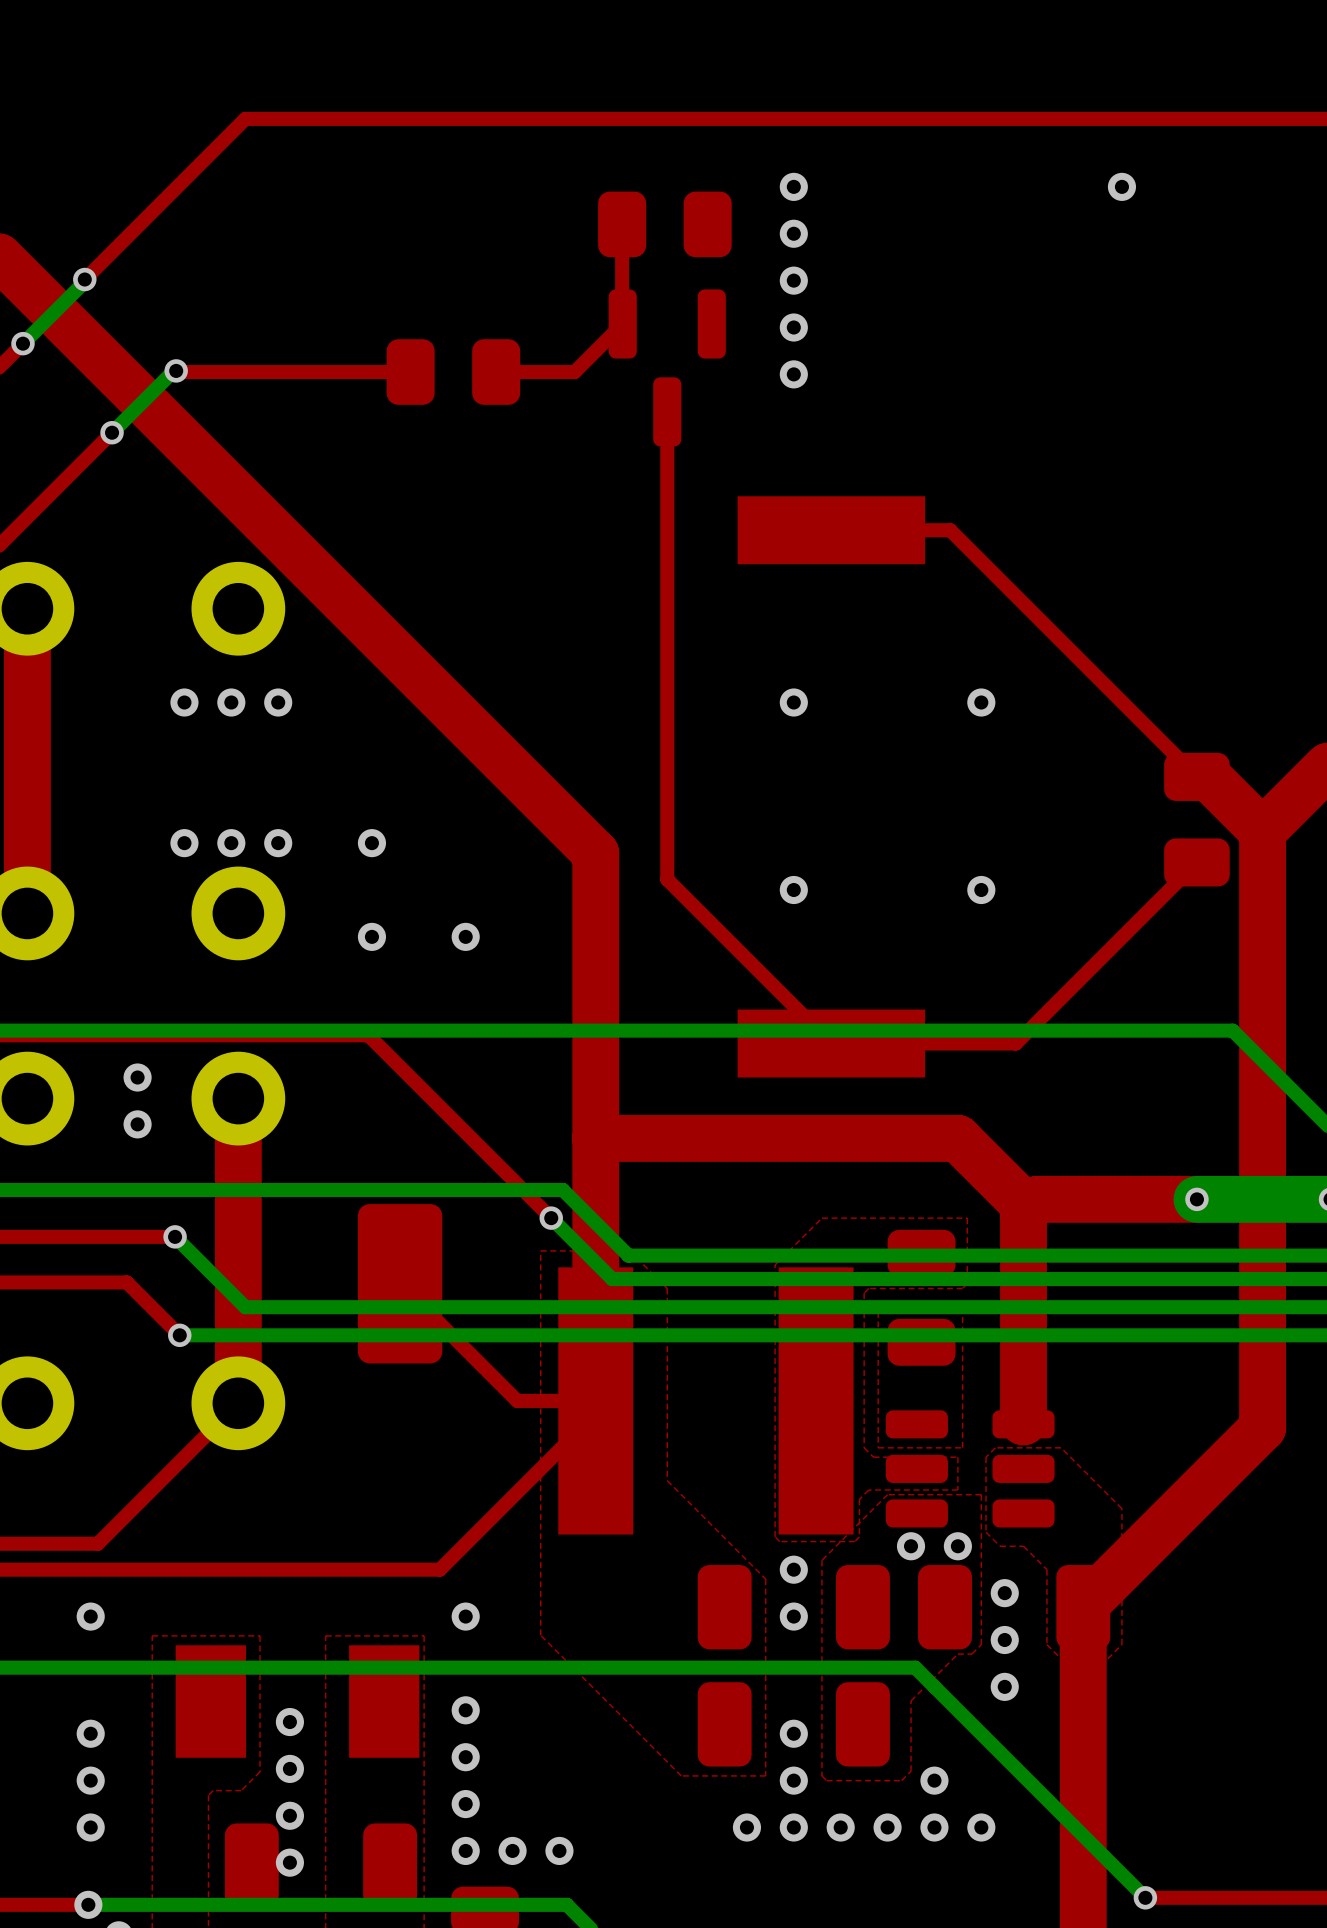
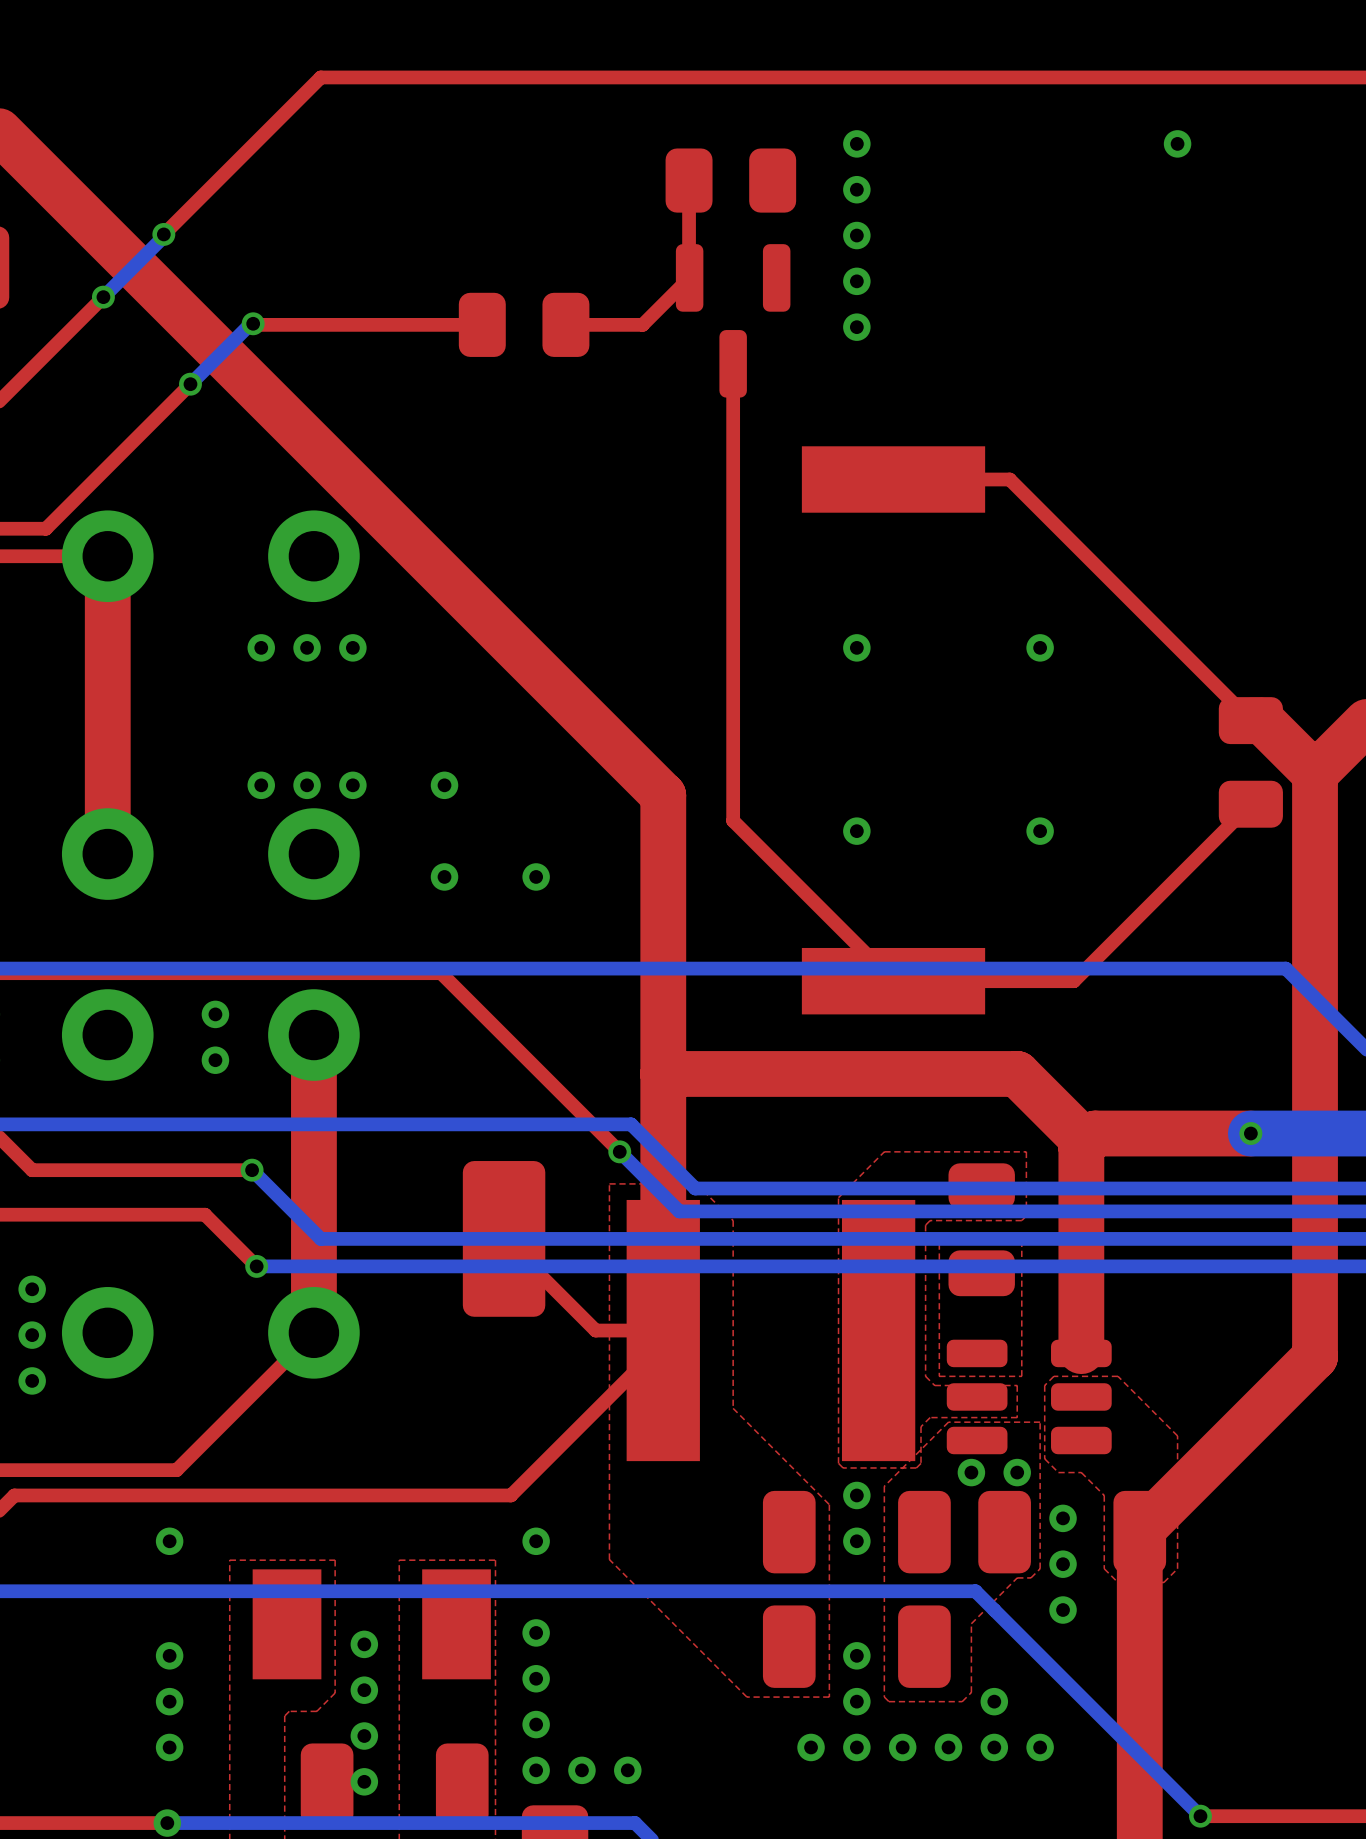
top track: (400, 1283) (517, 1400) (526, 1400) -> (504, 1238) (595, 1330)
part position: (400, 1283) -> (504, 1238)

